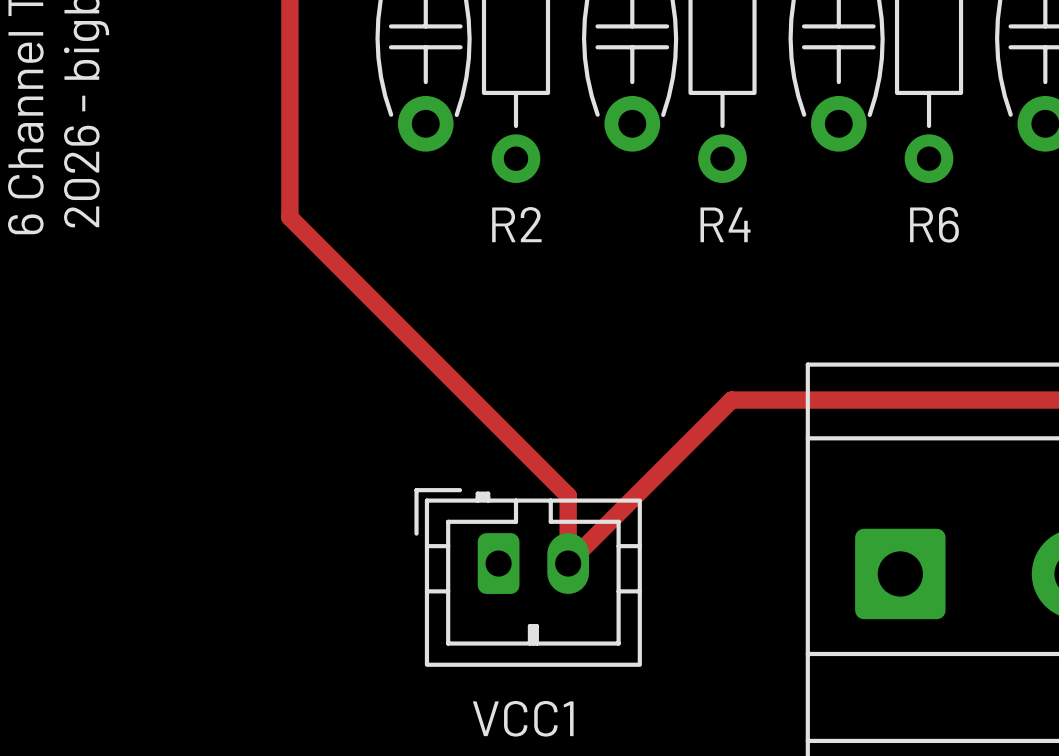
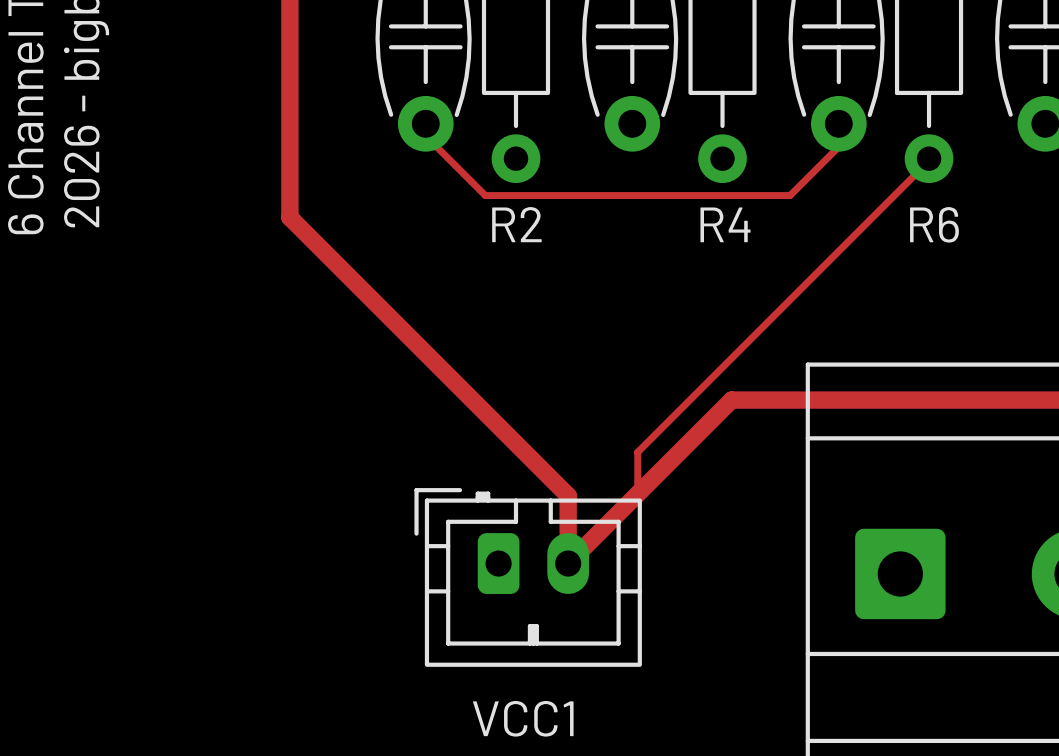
track: none -> (429, 139) (485, 195) (790, 195) (846, 139)
track: none -> (924, 165) (637, 452) (637, 487)

